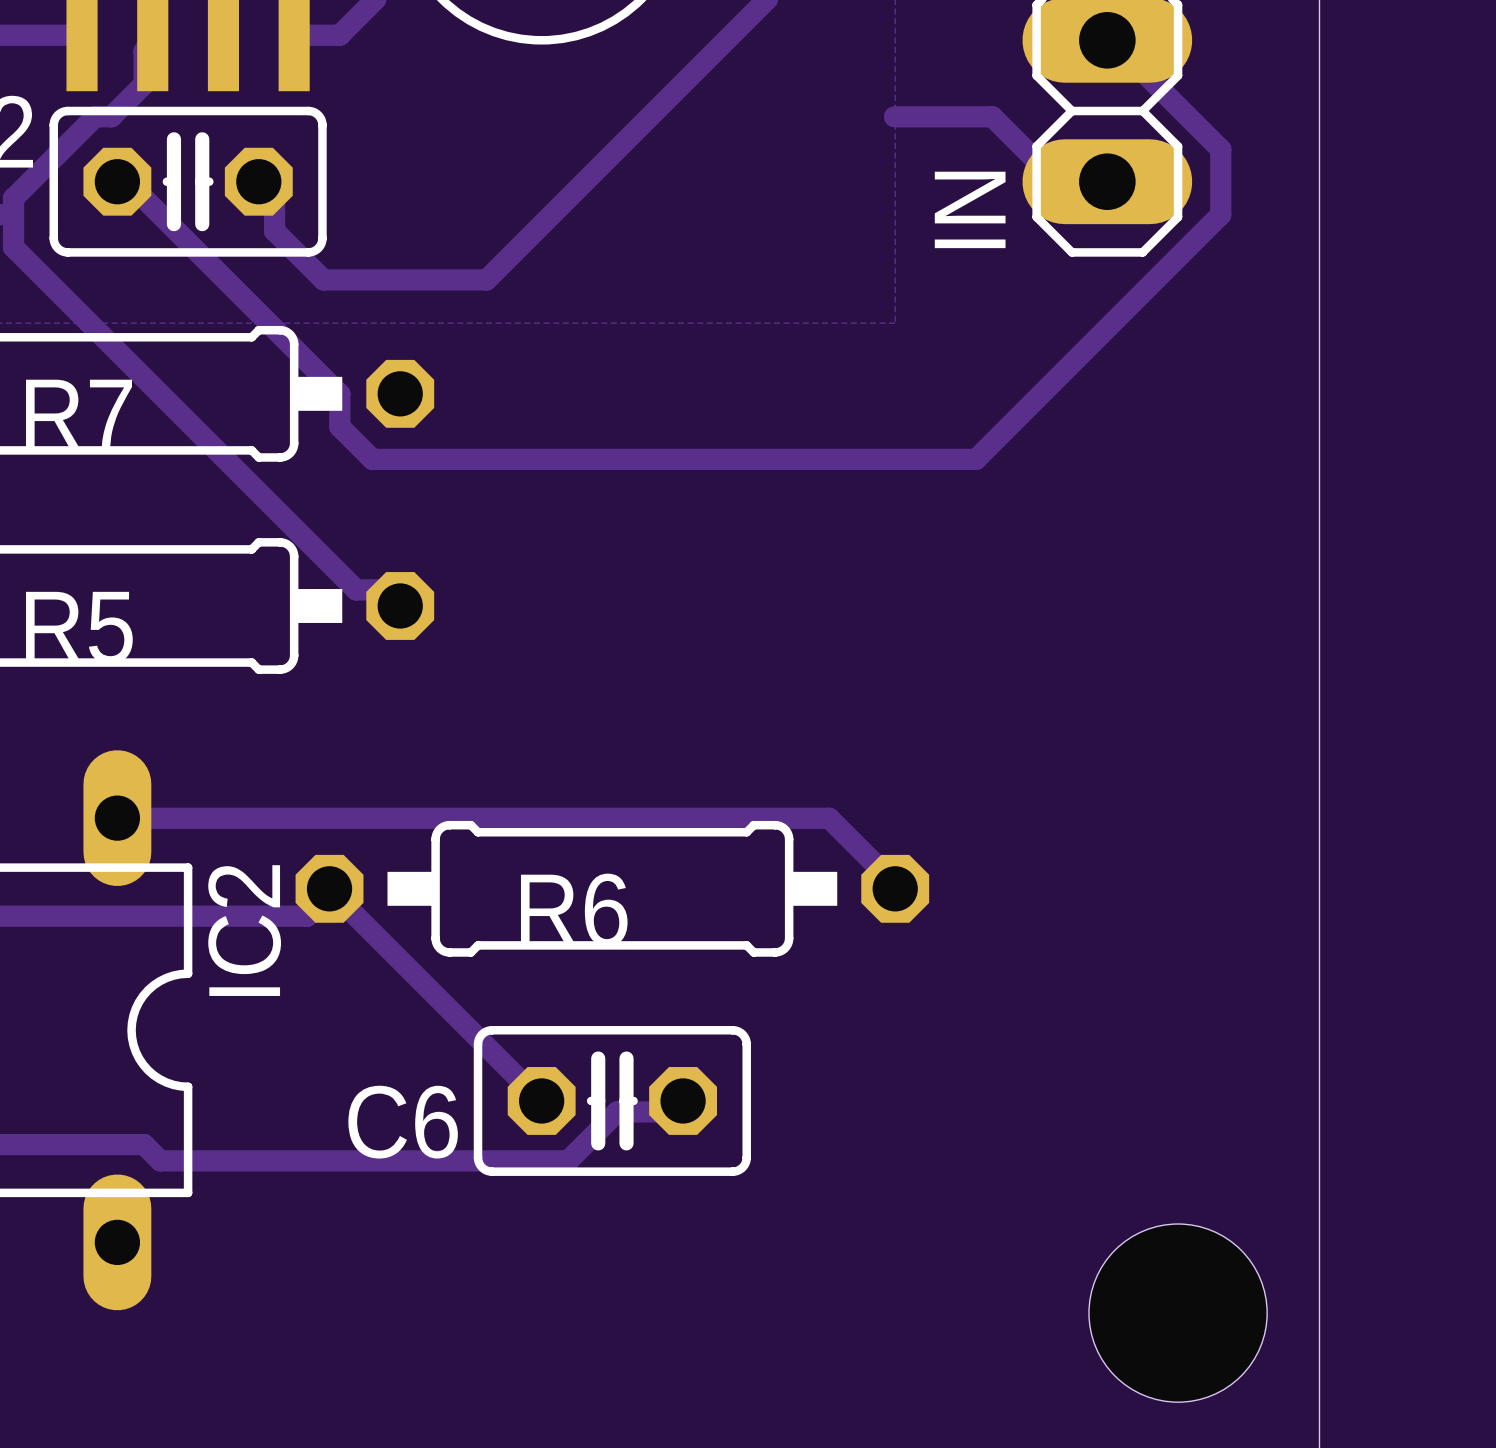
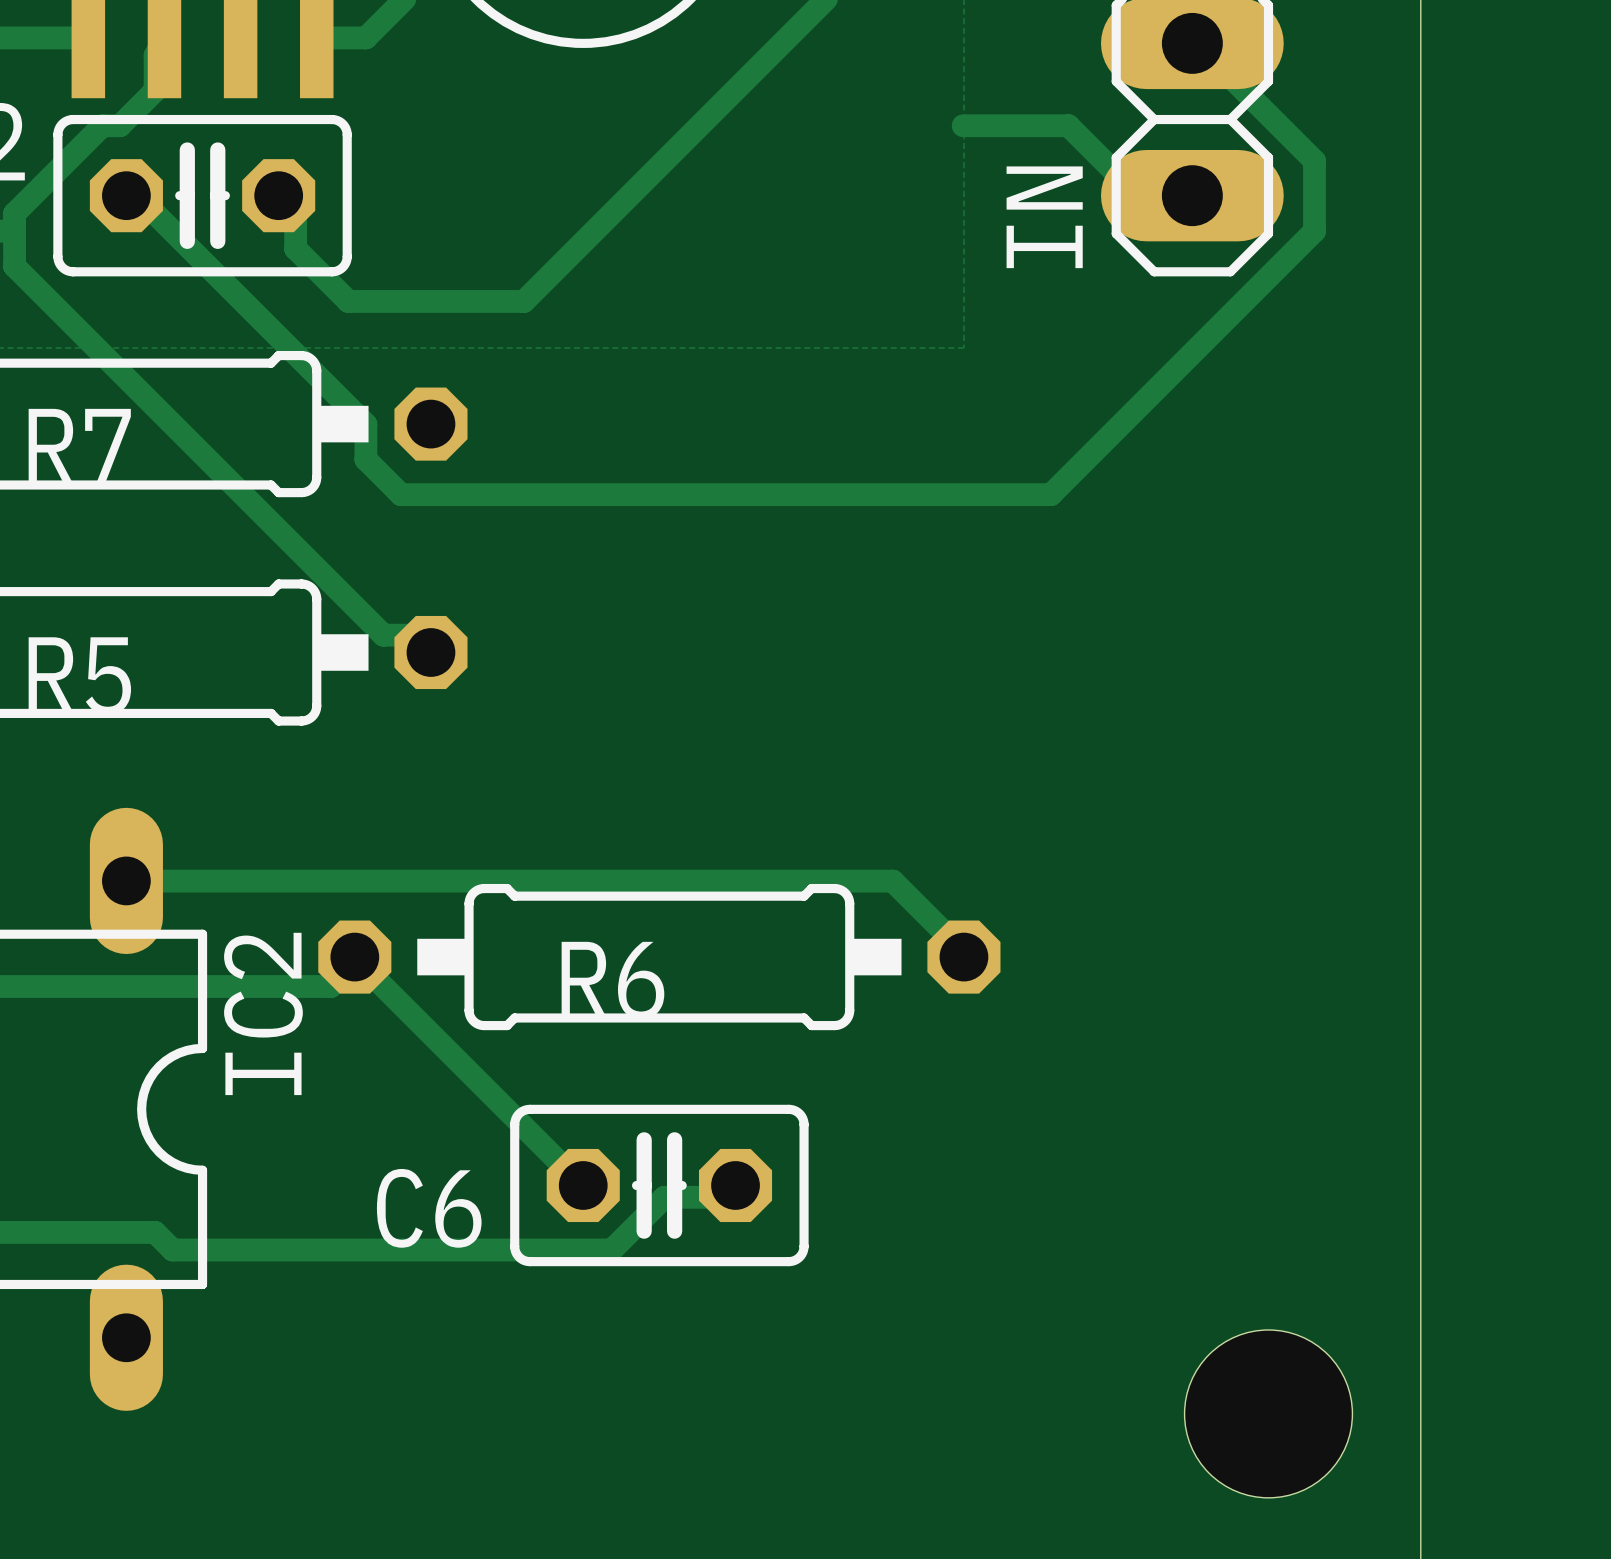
hole size: [1088, 1224, 1268, 1403] -> [1184, 1329, 1353, 1498]

